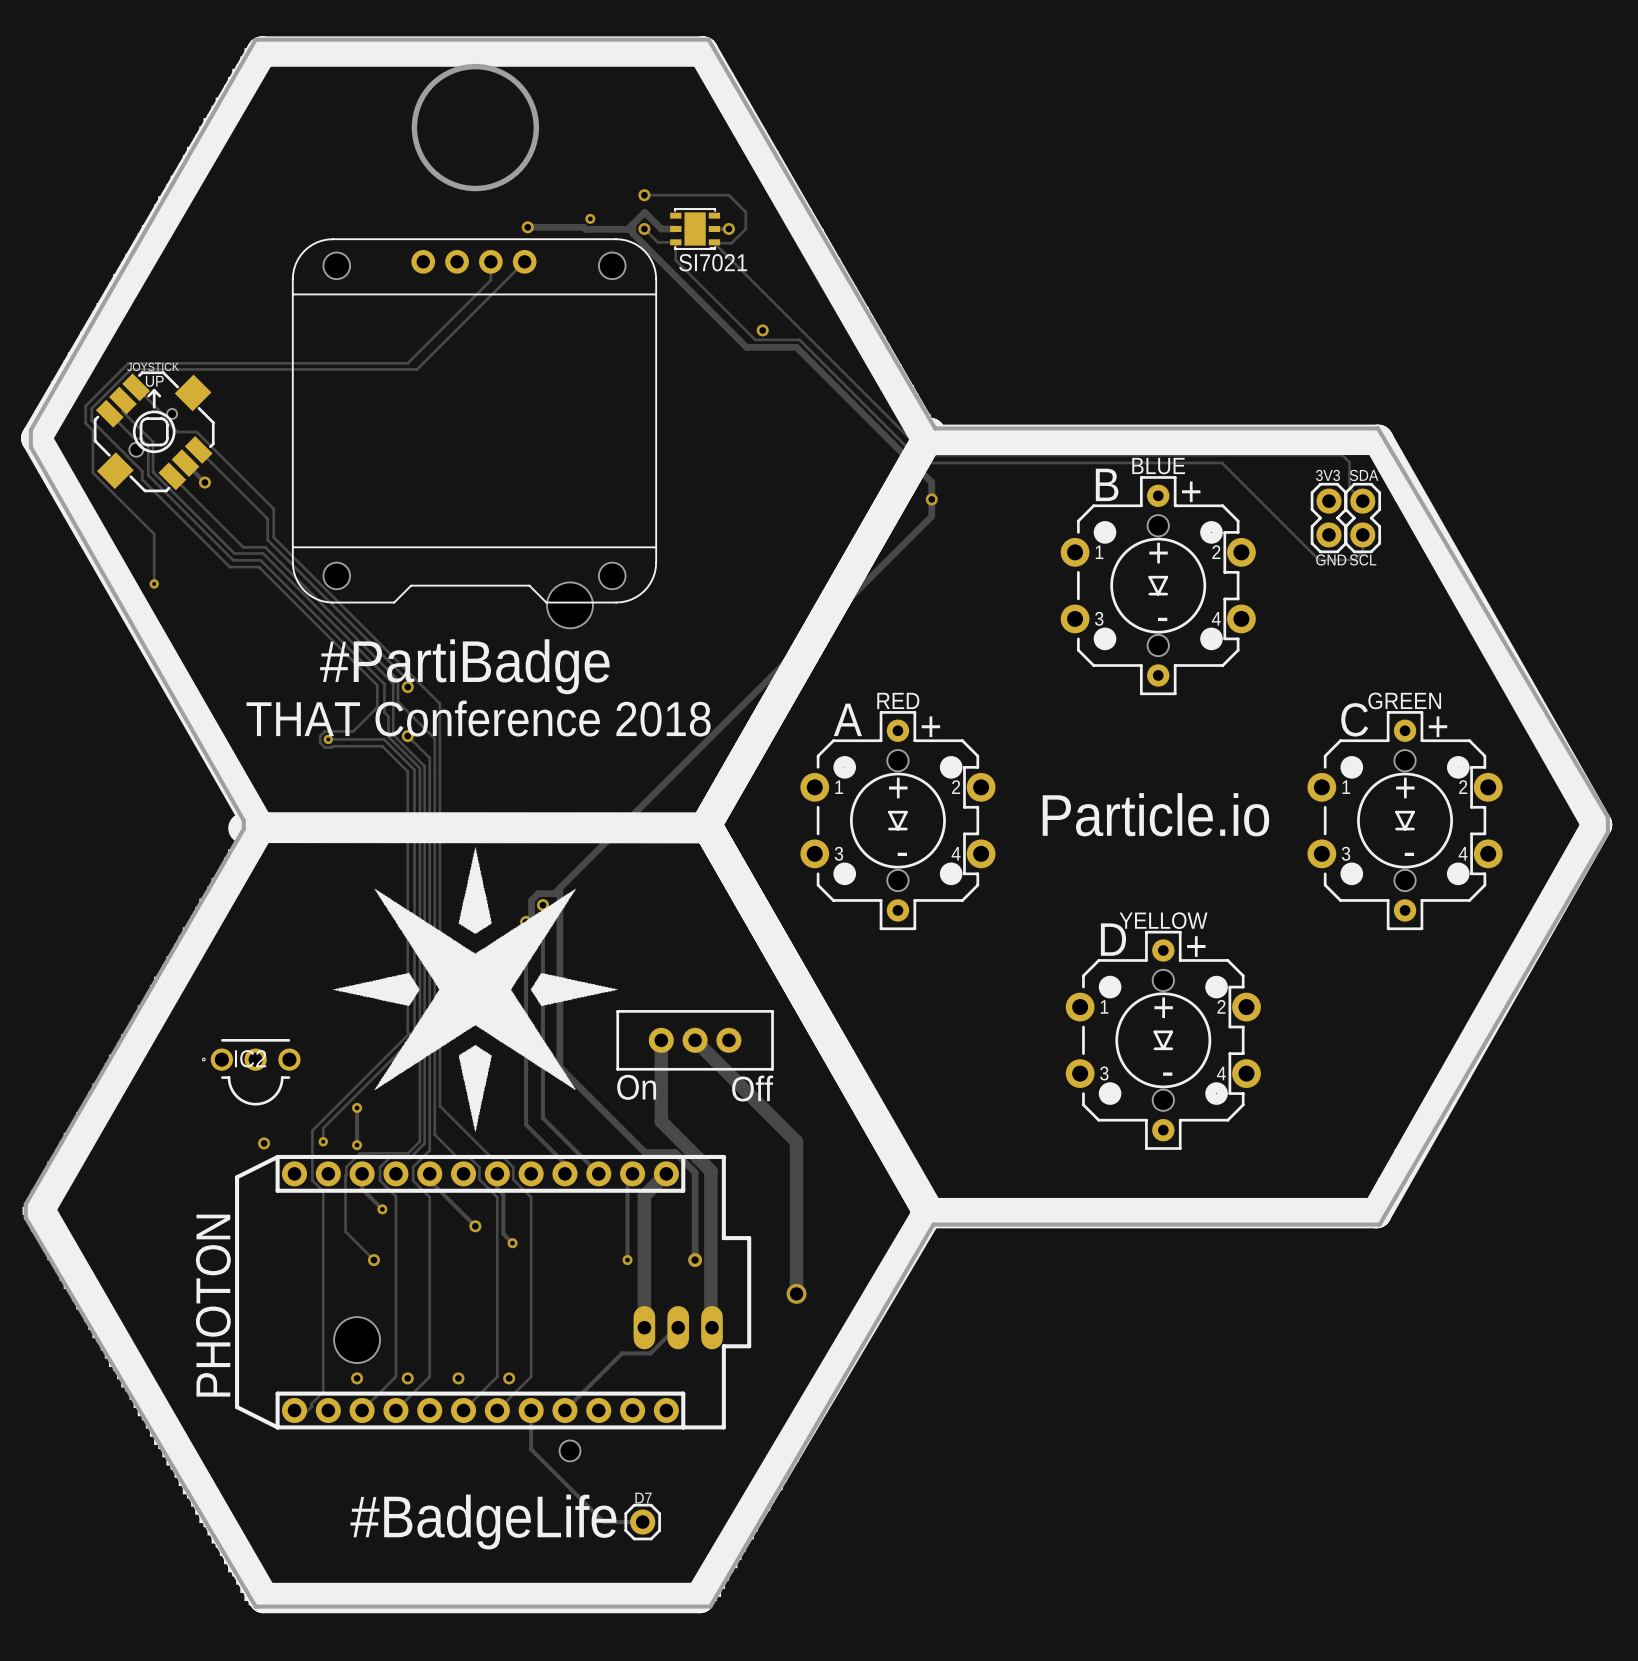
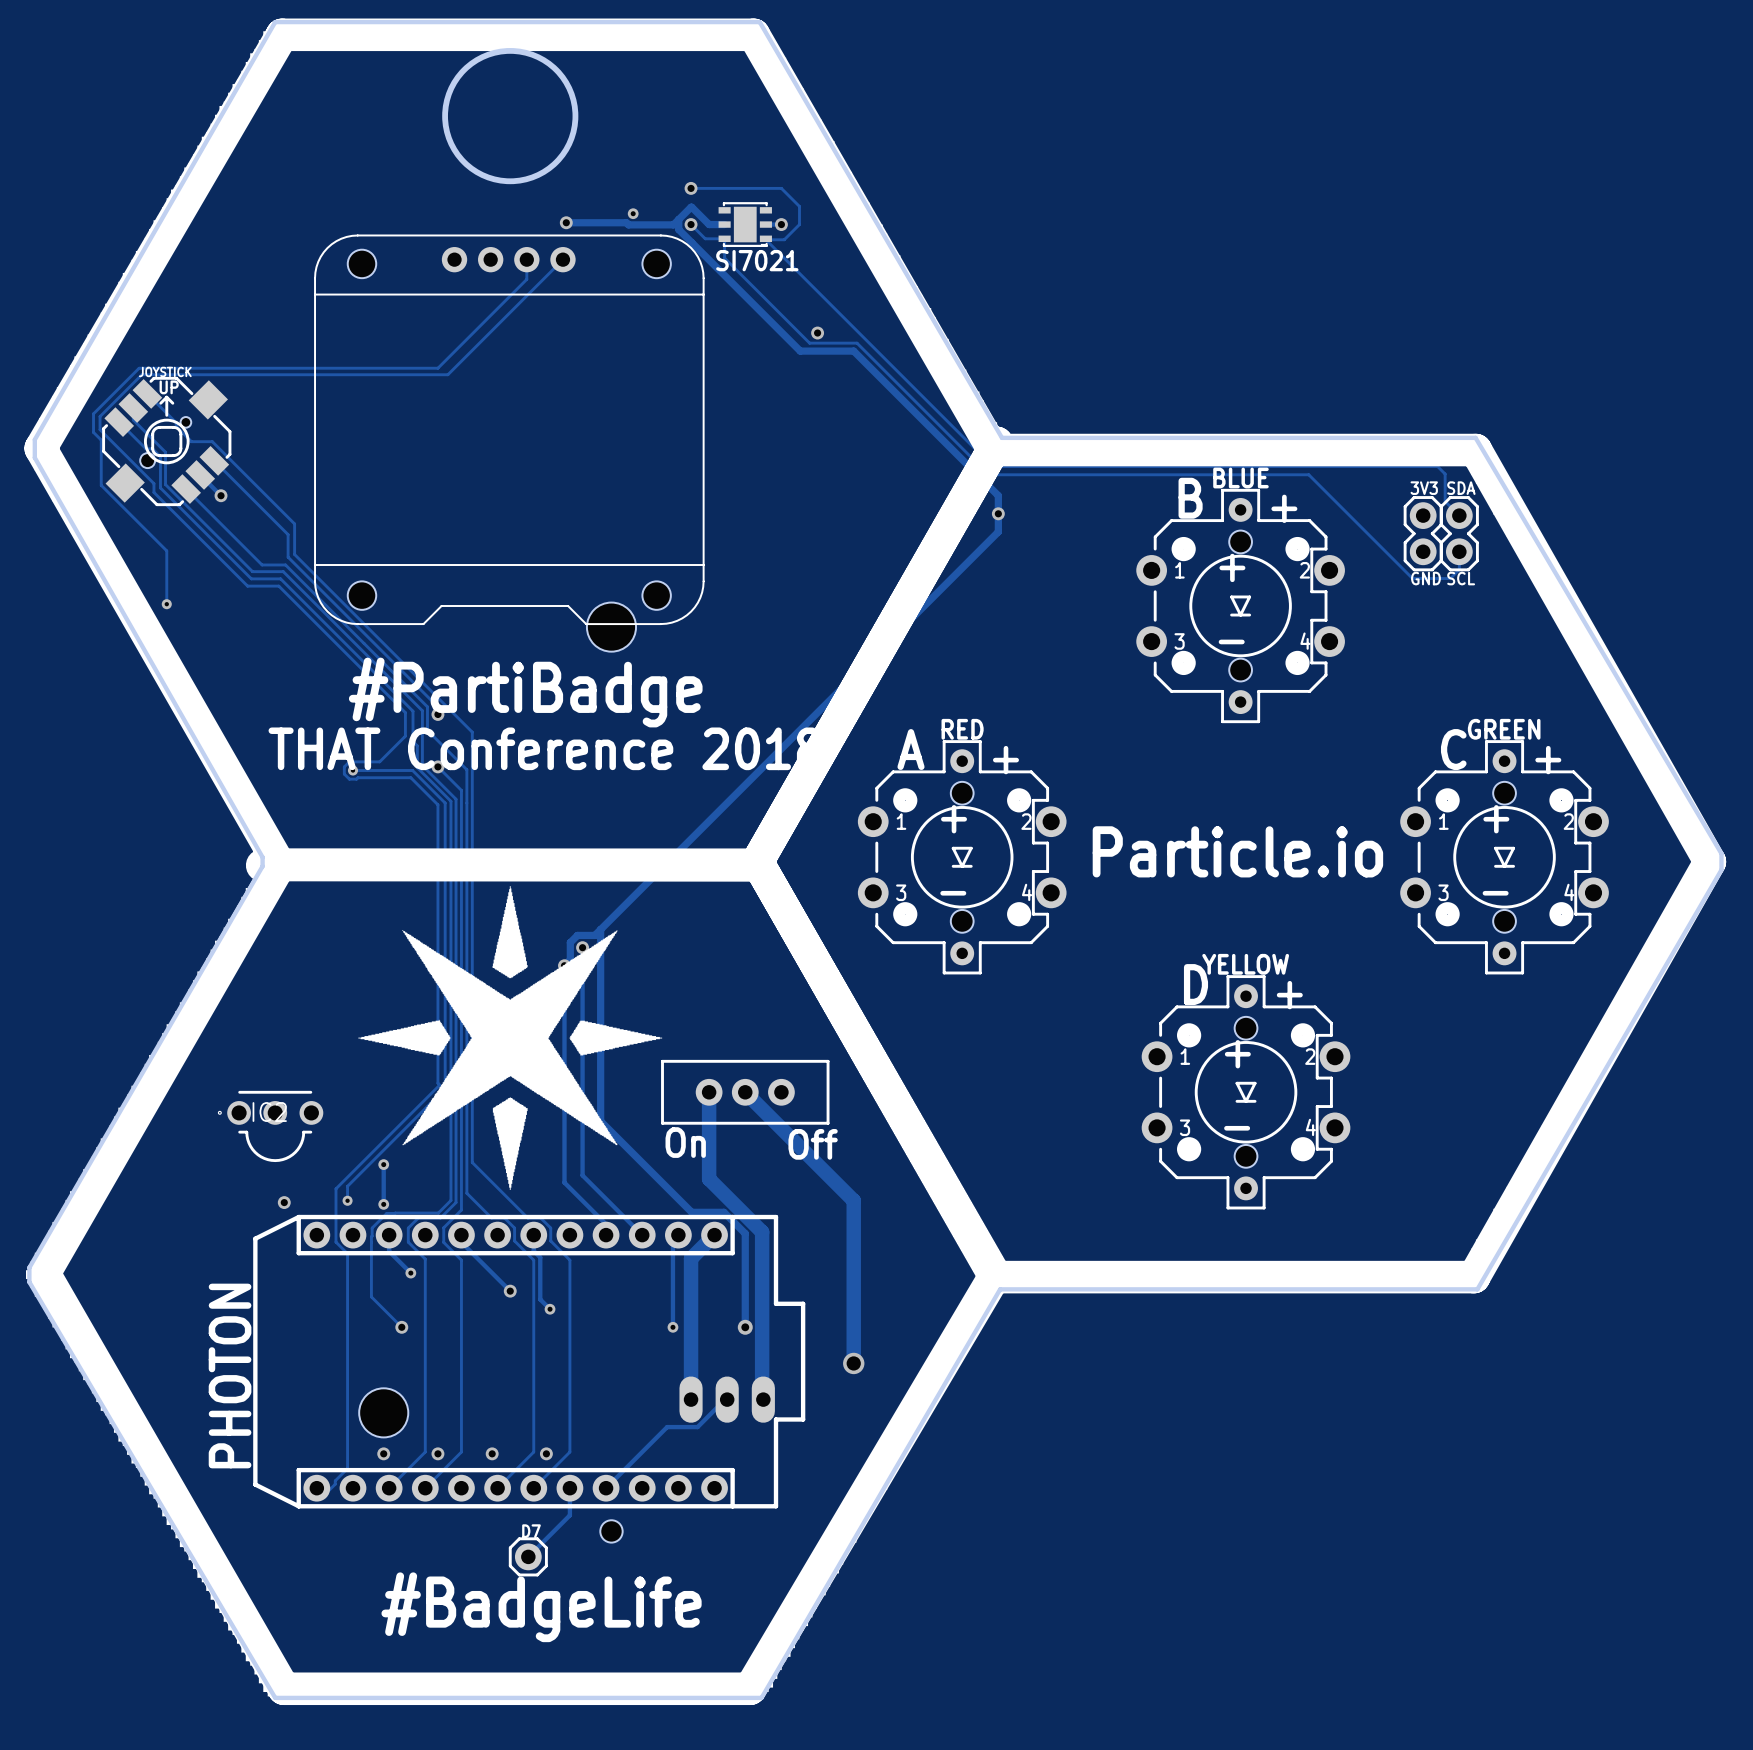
track: (531, 1435) (531, 1449) (603, 1522) (642, 1522) -> (569, 1515) (528, 1556)
D7 position: (642, 1522) -> (528, 1556)

